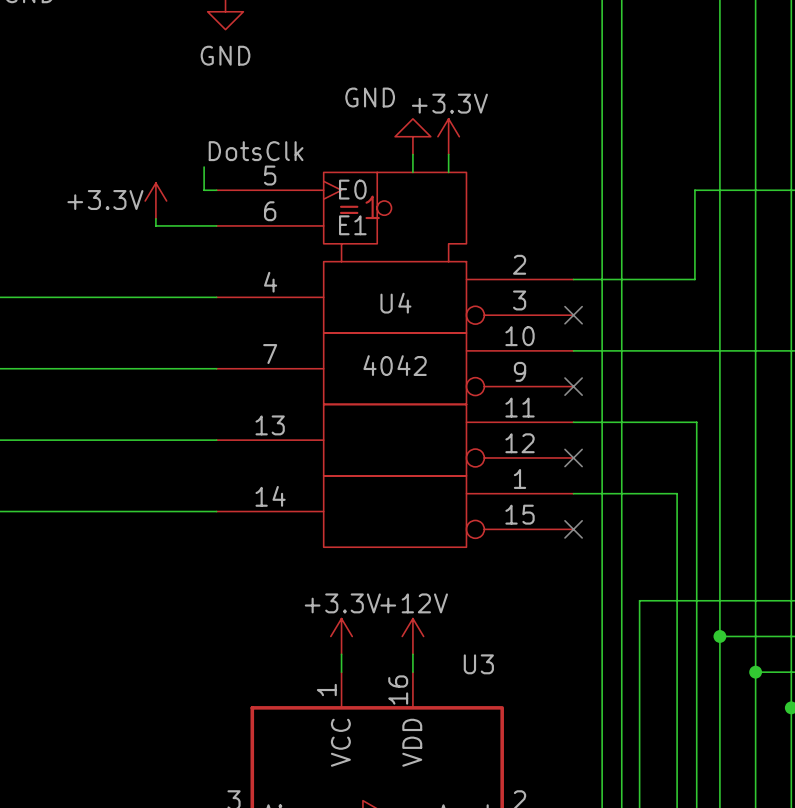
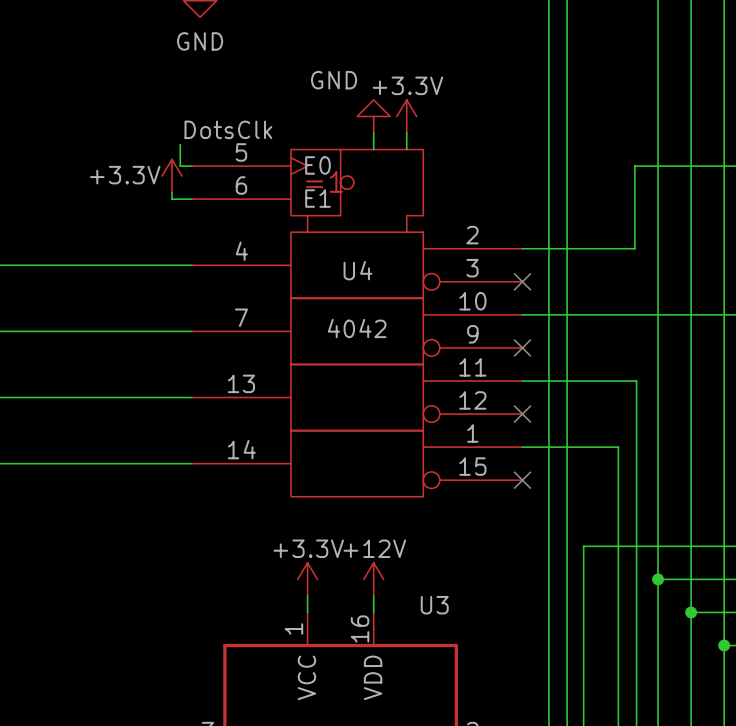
power symbol position: +3.3V (155, 200) -> +3.3V (172, 176)
wire: (155, 218) (155, 225) (195, 225) -> (172, 192) (172, 199)

